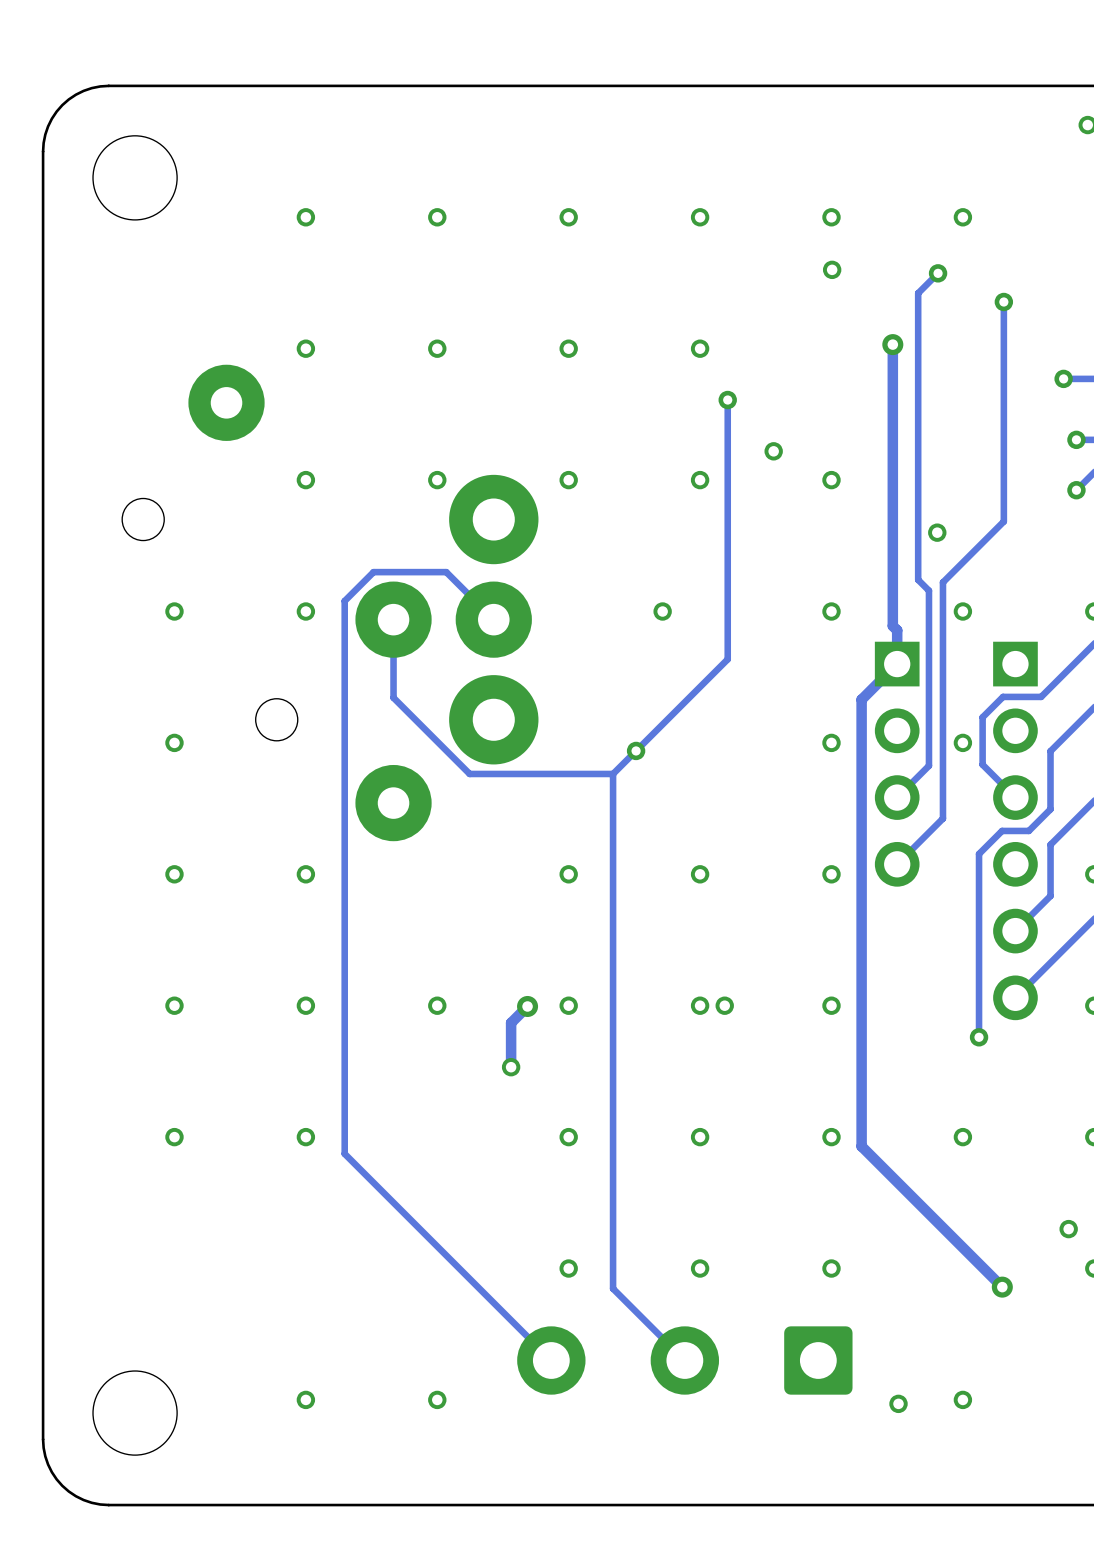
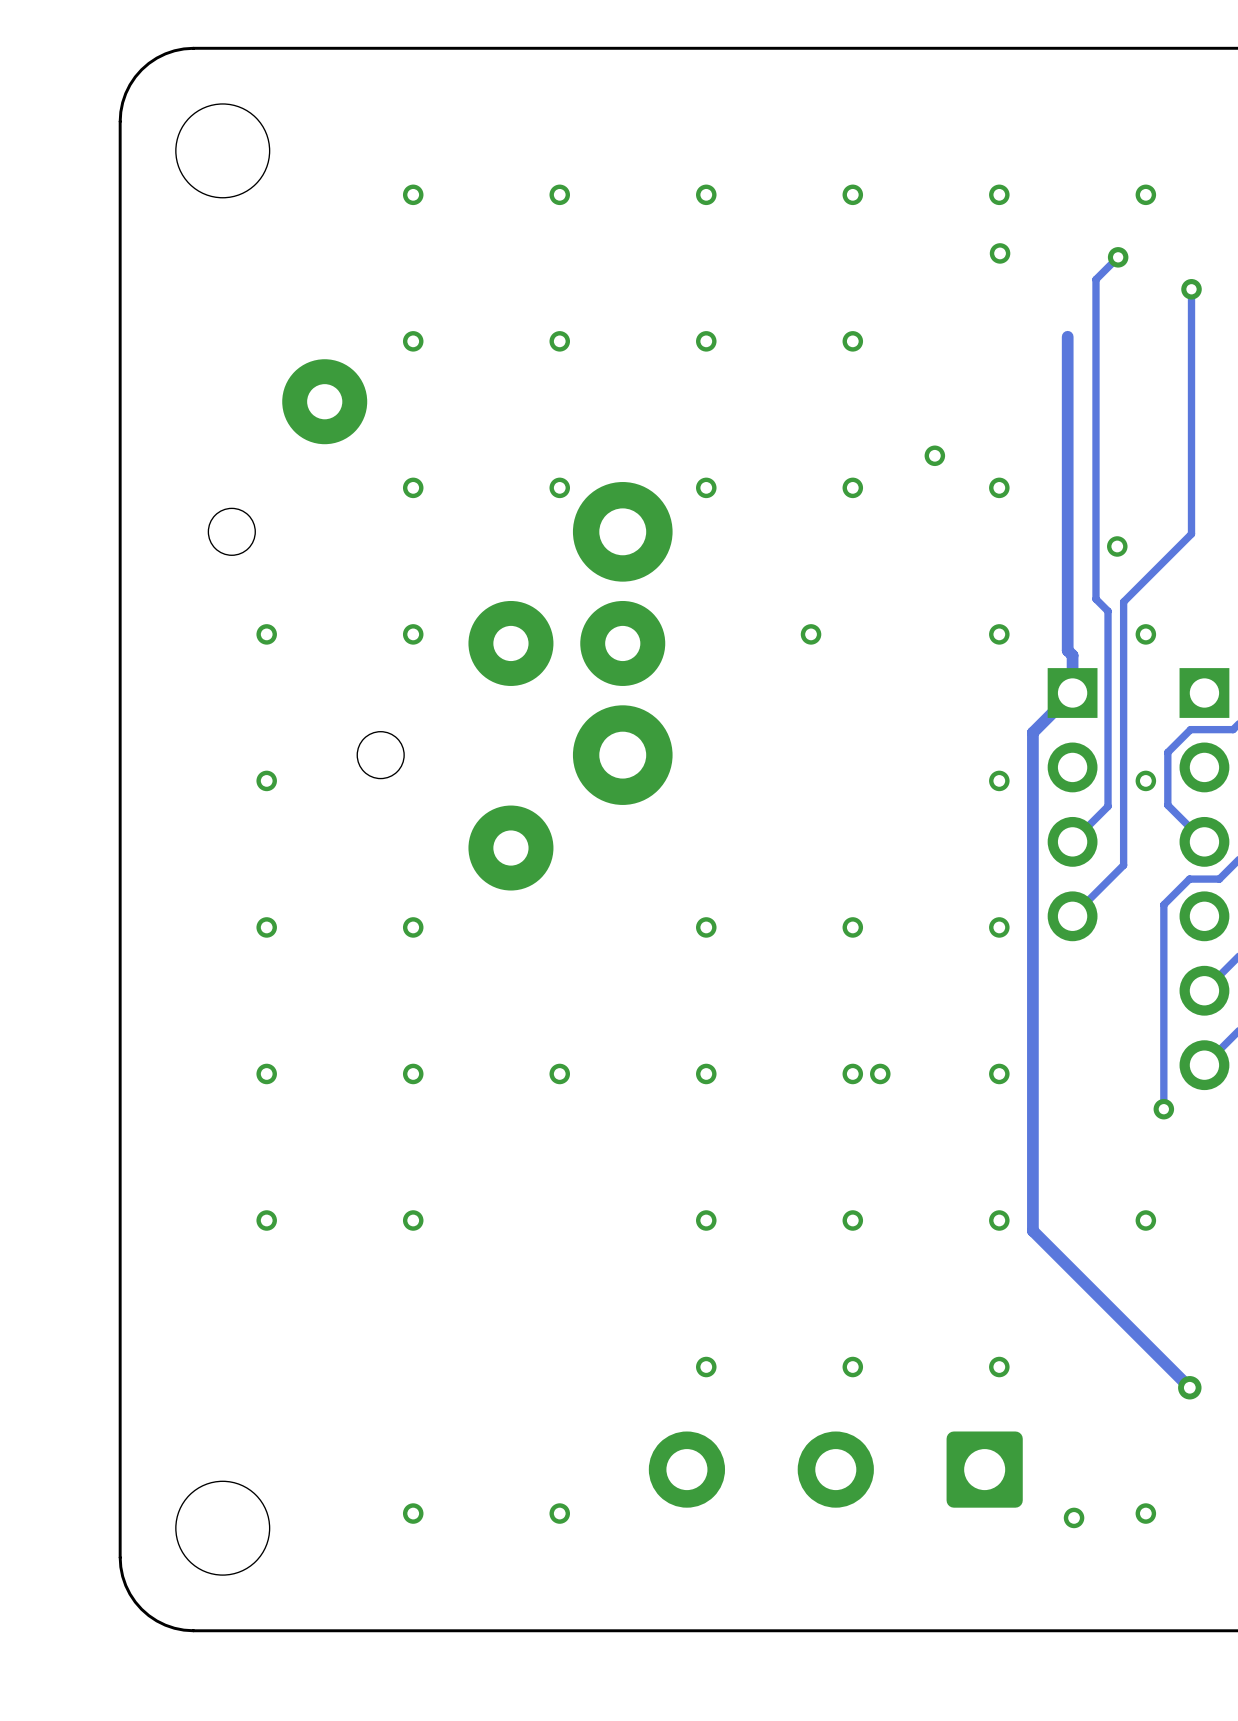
via: (892, 344) -> none
track: (727, 400) (727, 659) (613, 773) -> none
via: (727, 400) -> none
track: (393, 619) (393, 697) (469, 773) (613, 773) -> none
track: (493, 619) (446, 572) (373, 572) (344, 601) (344, 1153) (551, 1360) -> none
via: (636, 750) -> none
track: (613, 773) (613, 1288) (684, 1360) -> none
track: (527, 1006) (511, 1022) (511, 1067) -> none
via: (527, 1006) -> none
via: (511, 1067) -> none

